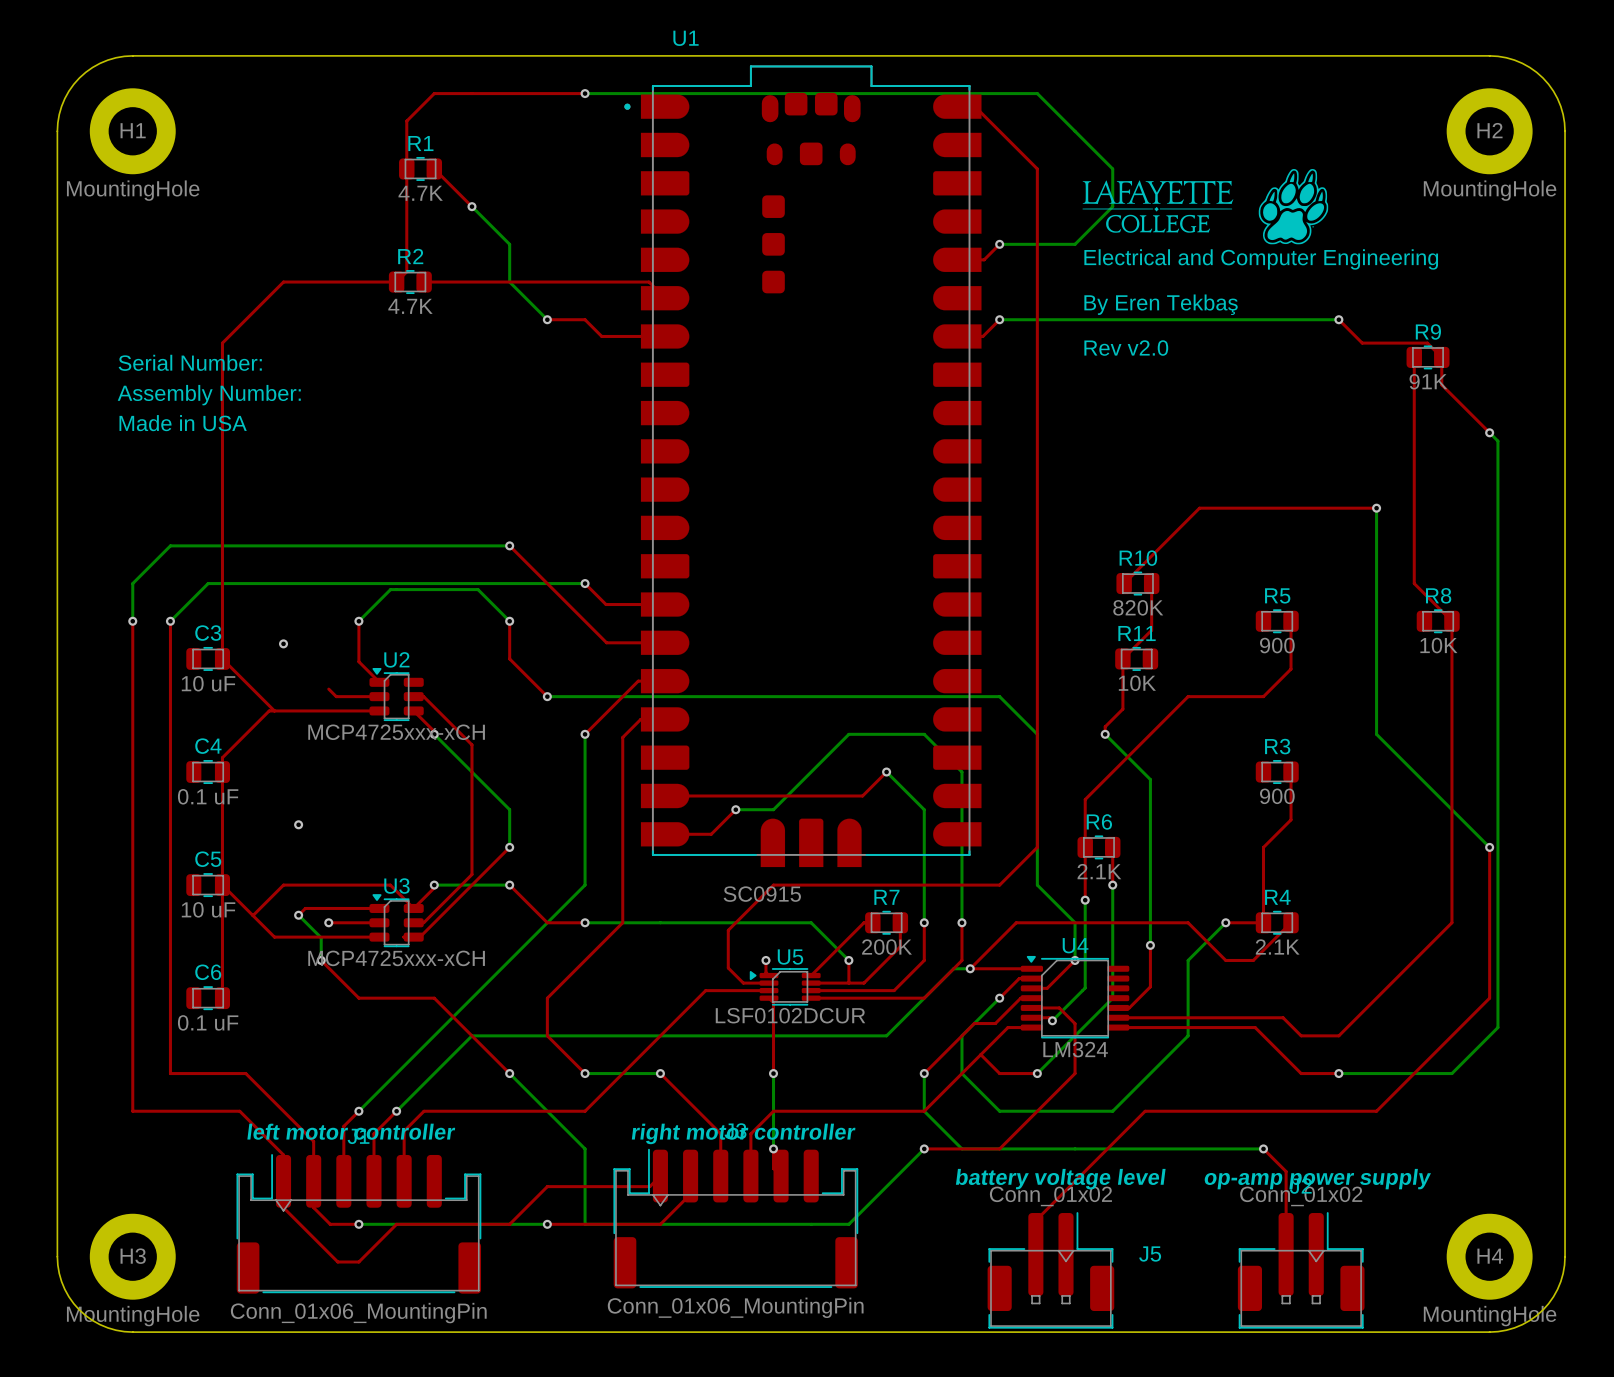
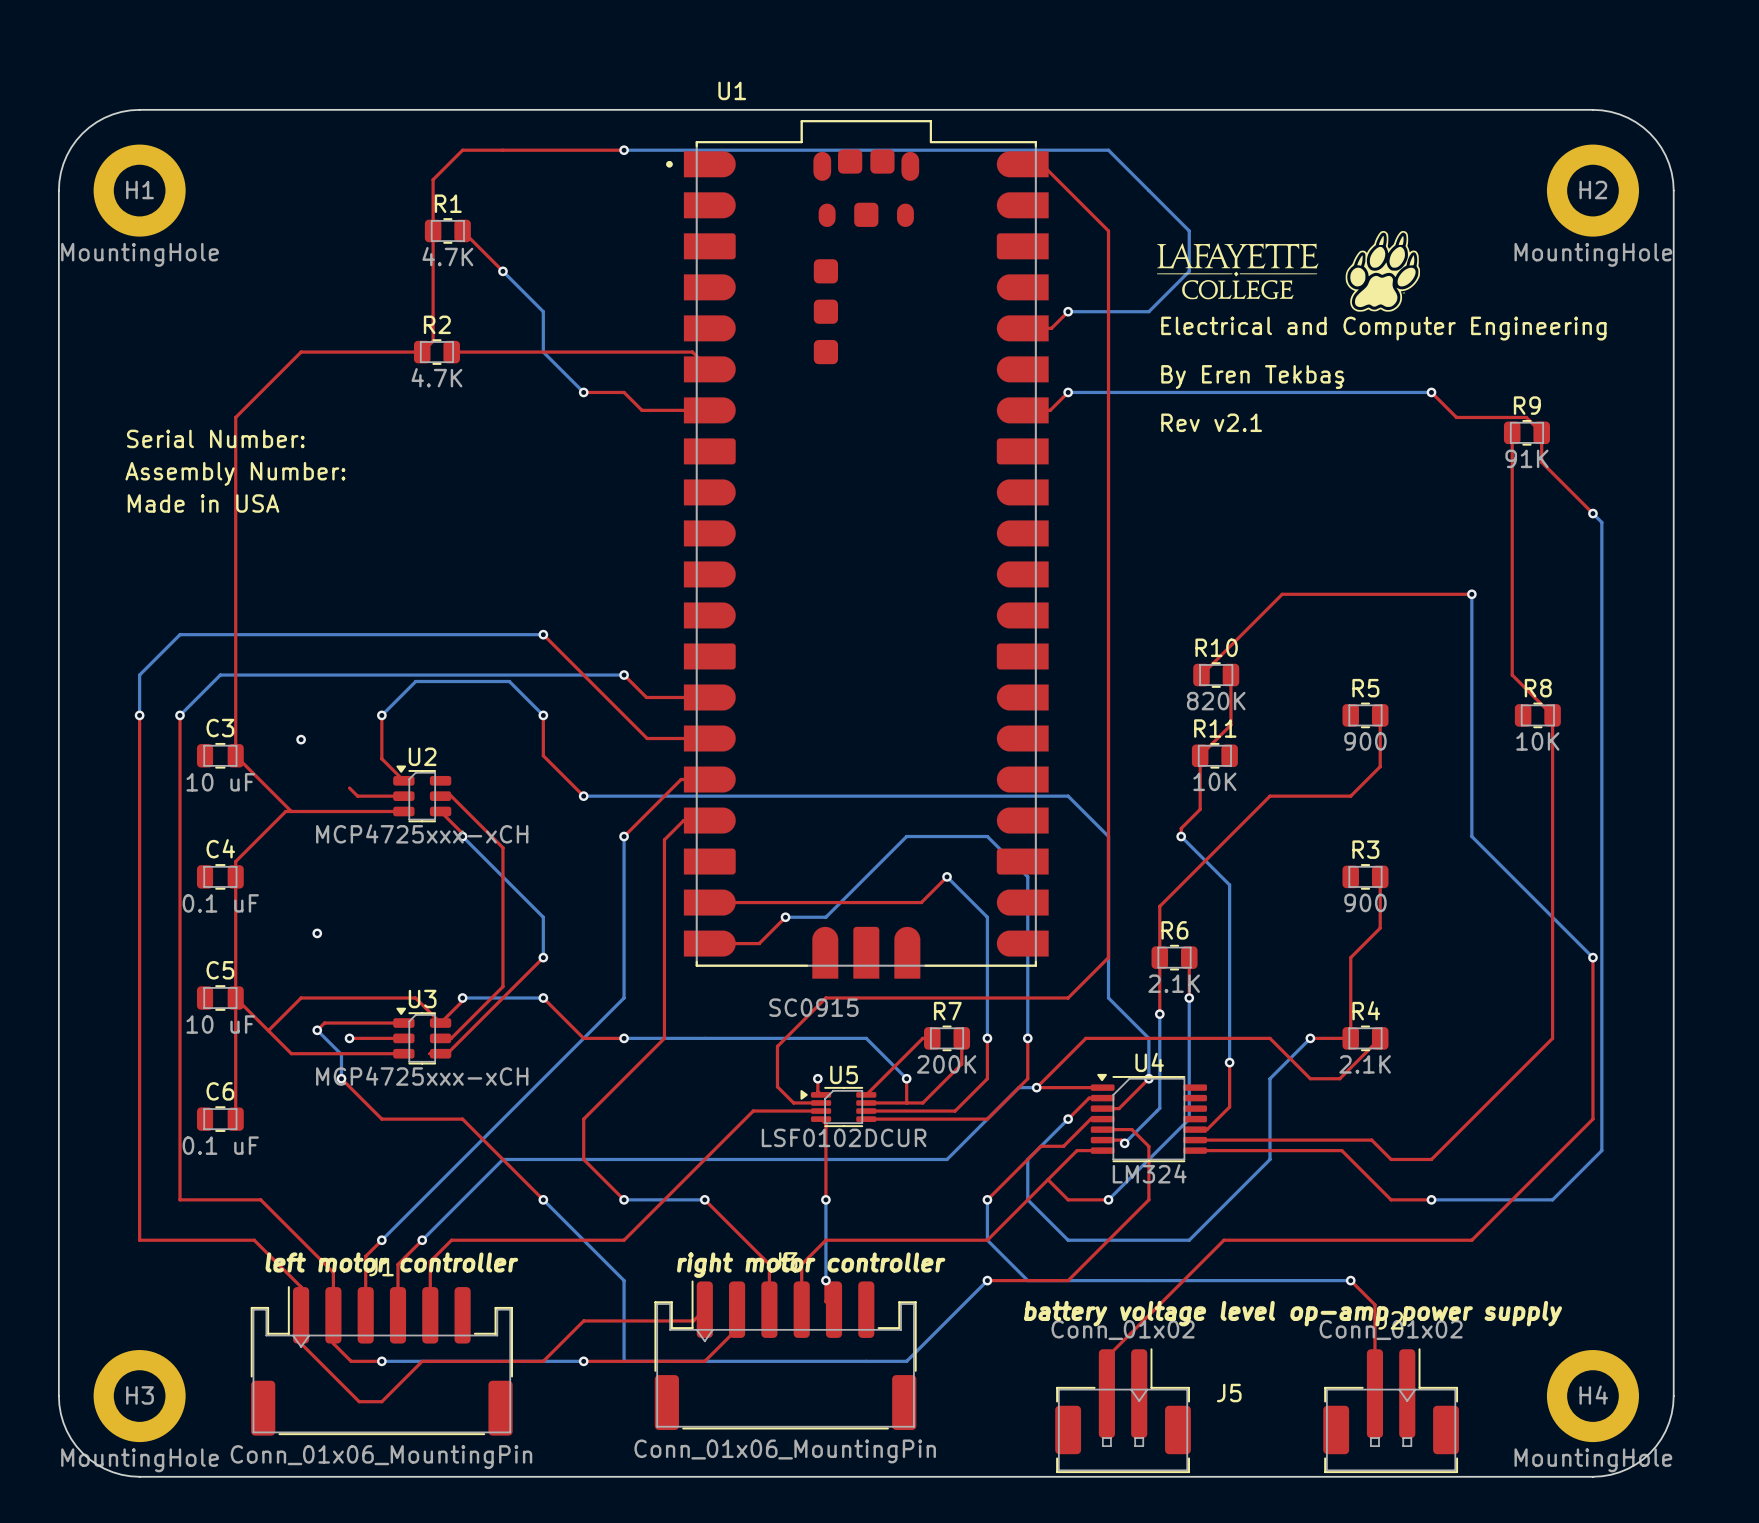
text: Rev v2.0 (1126, 348) -> Rev v2.1 (1211, 422)

